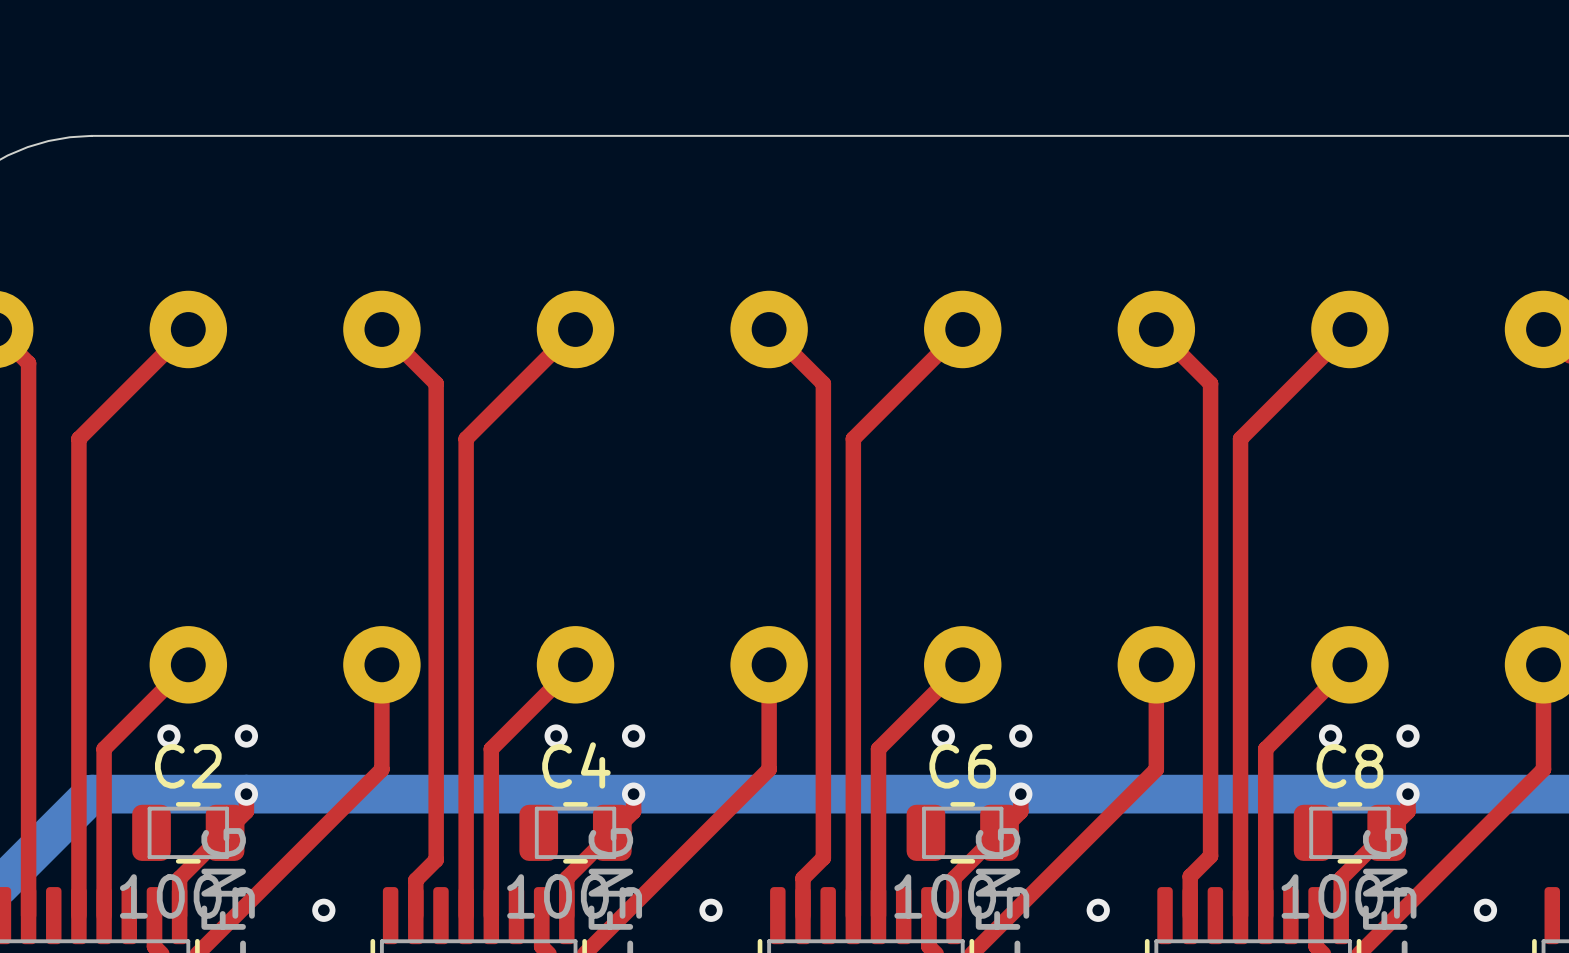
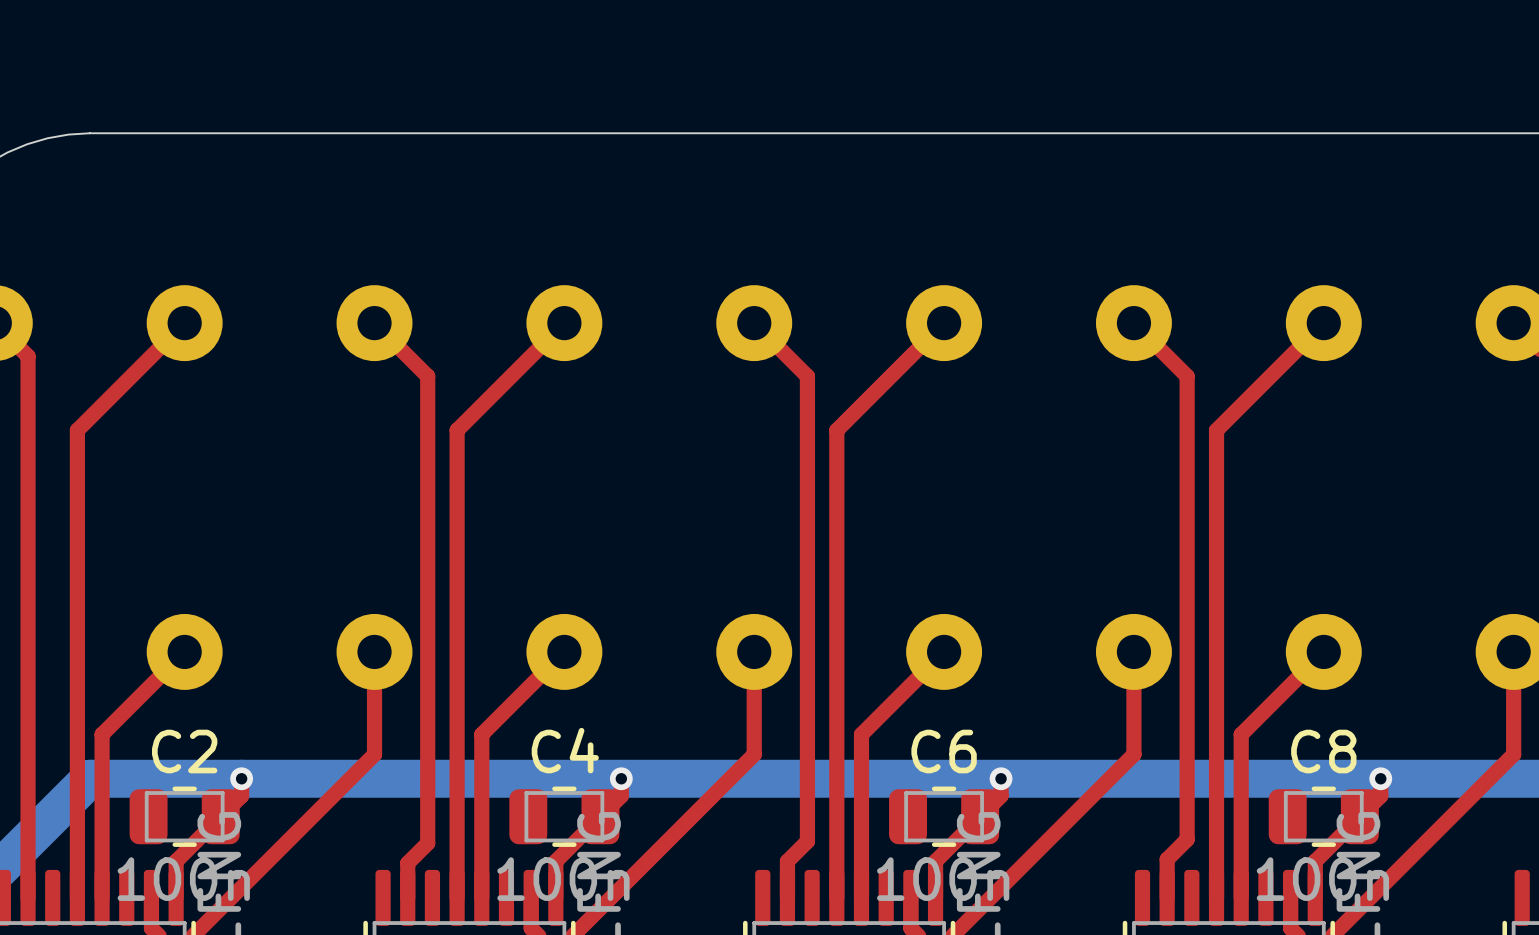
via: (168, 736) -> none
via: (246, 736) -> none
via: (556, 736) -> none
via: (633, 736) -> none
via: (943, 736) -> none
via: (1020, 736) -> none
via: (1330, 736) -> none
via: (1408, 736) -> none
via: (323, 910) -> none
via: (711, 910) -> none
via: (1098, 910) -> none
via: (1485, 910) -> none

